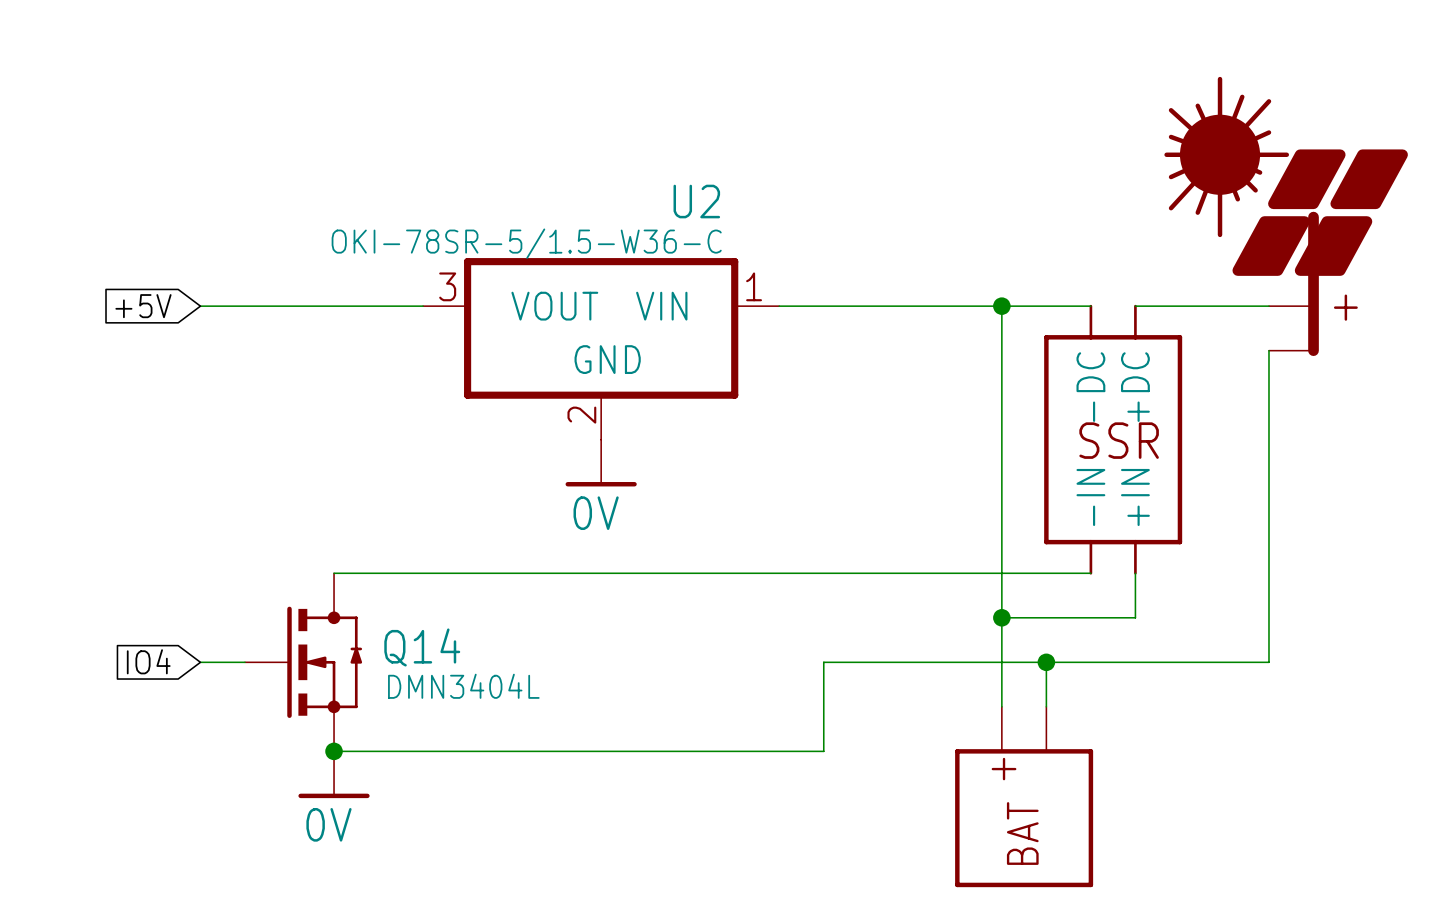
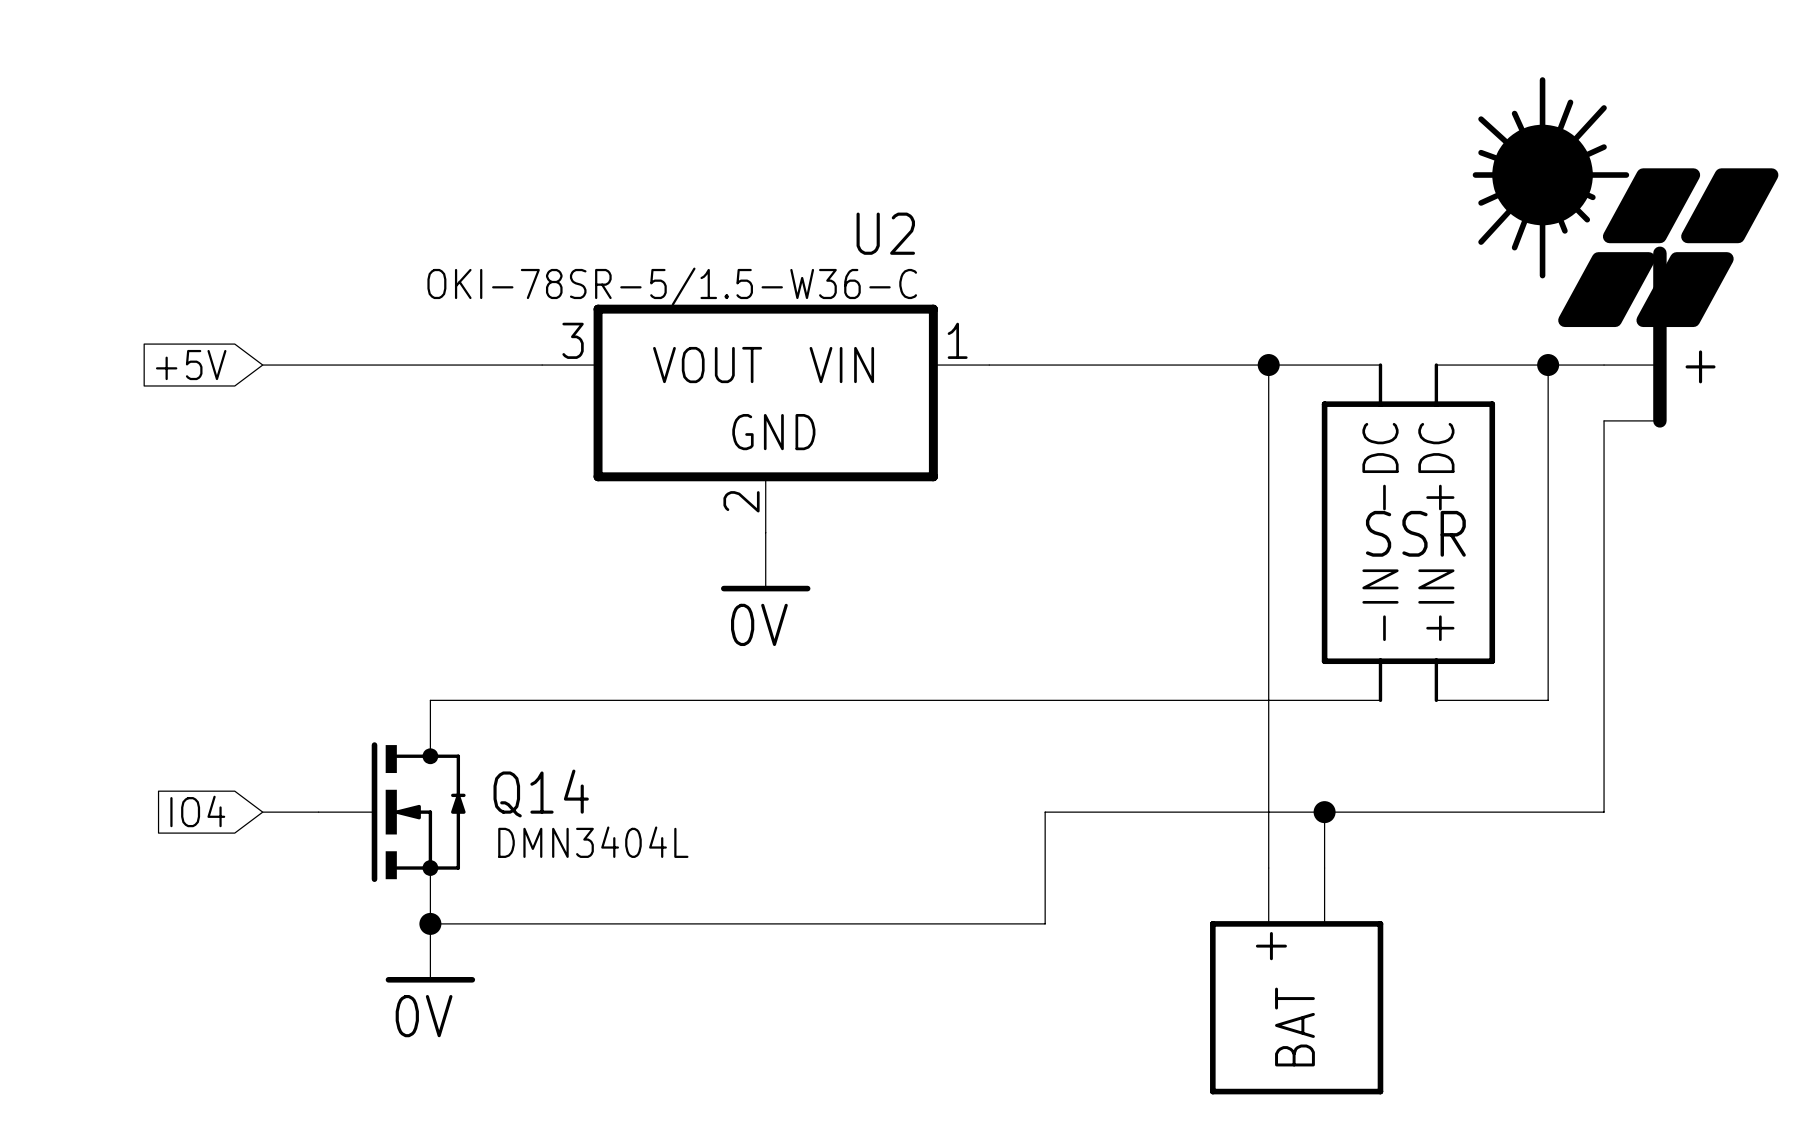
junction: none -> (1548, 365)
wire: (1135, 573) (1135, 617) (1001, 617) -> (1436, 700) (1548, 700) (1548, 365)
junction: (1001, 617) -> none

